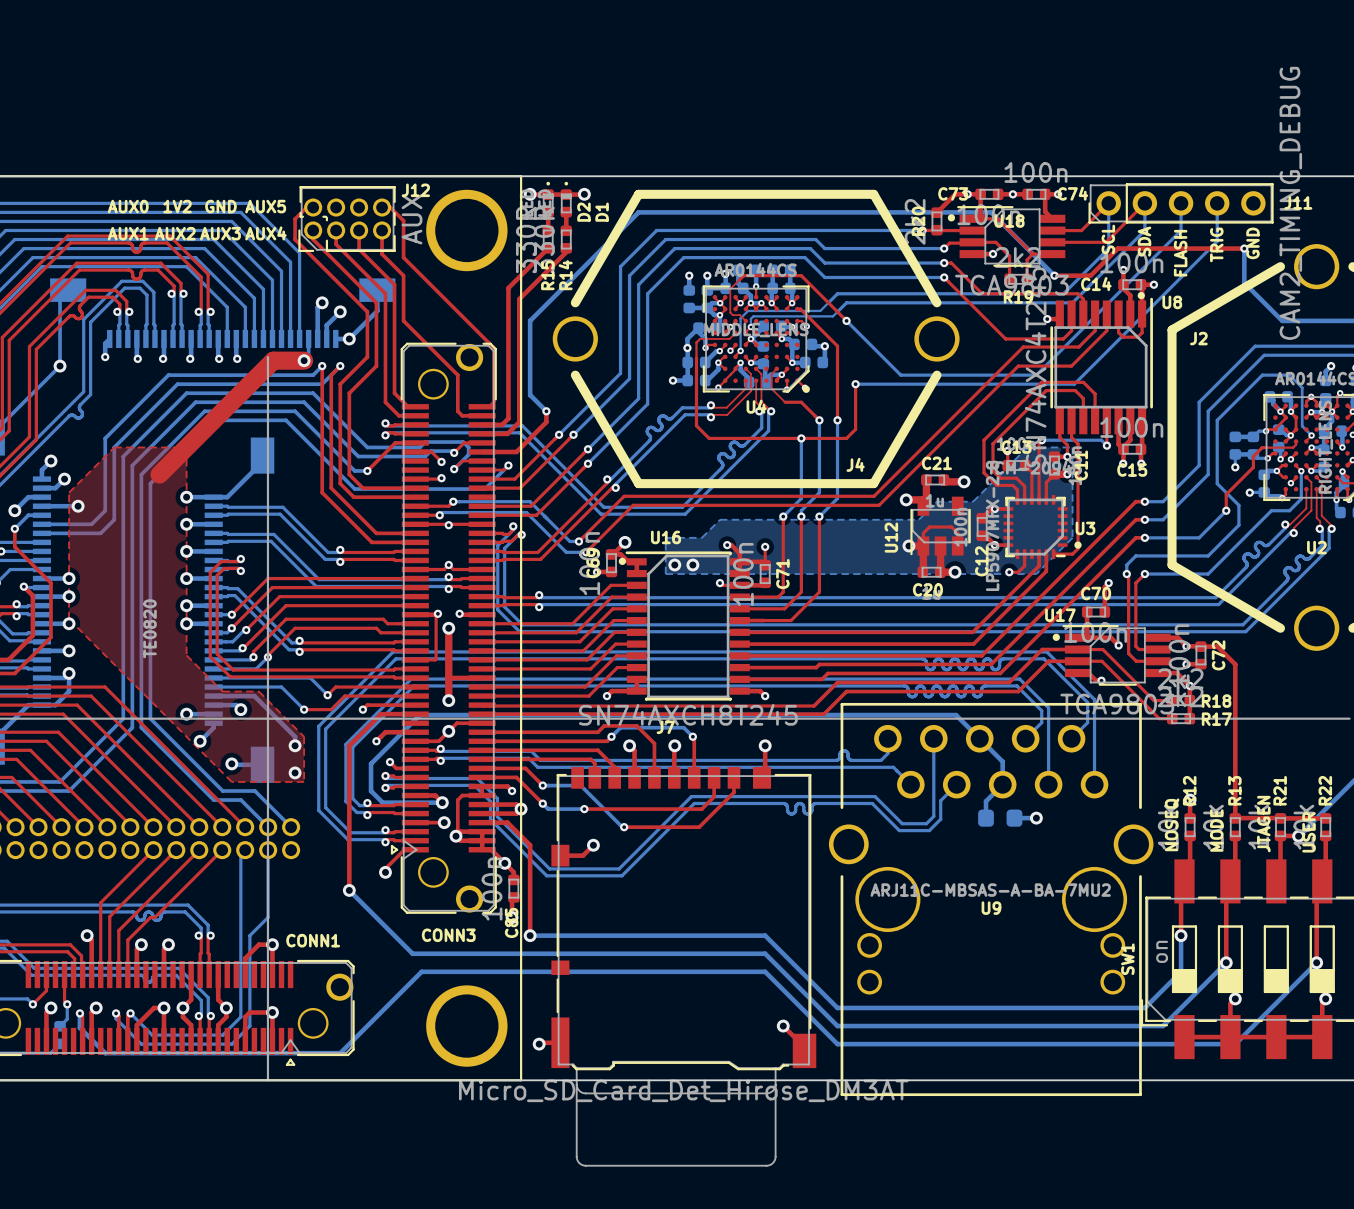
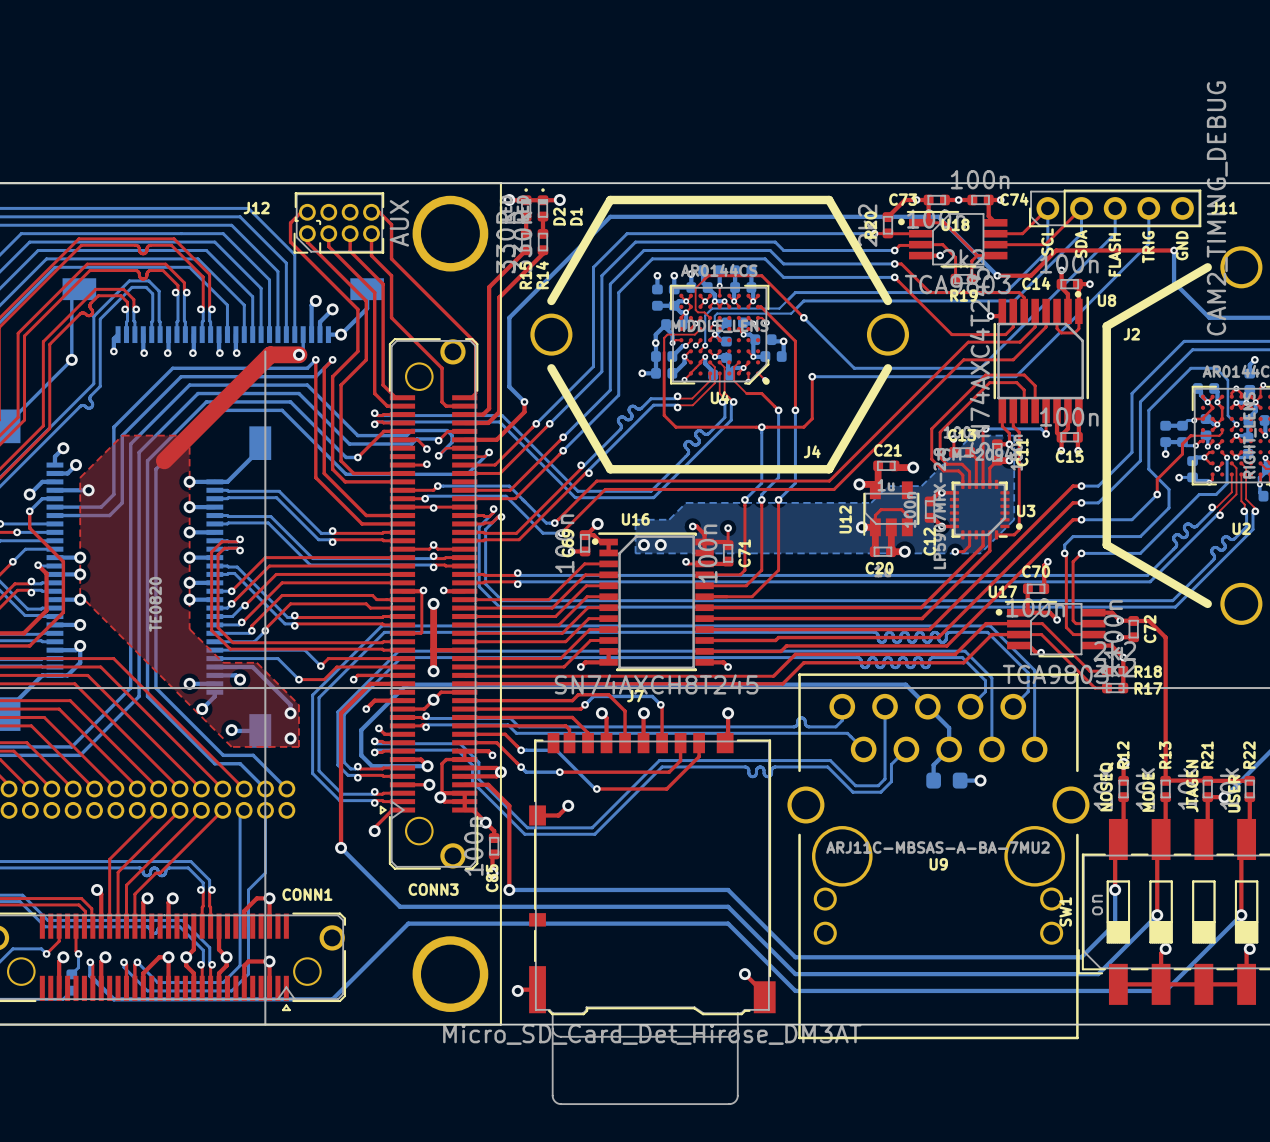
J12 name position: J12 (415, 190) -> J12 (256, 208)
text: AUX0 (128, 206) -> none
text: 1V2 (177, 206) -> none
text: GND (220, 206) -> none
text: AUX5 (265, 206) -> none
text: AUX1 (128, 233) -> none
text: AUX2 (175, 233) -> none
text: AUX3 (220, 233) -> none
text: AUX4 (265, 233) -> none

